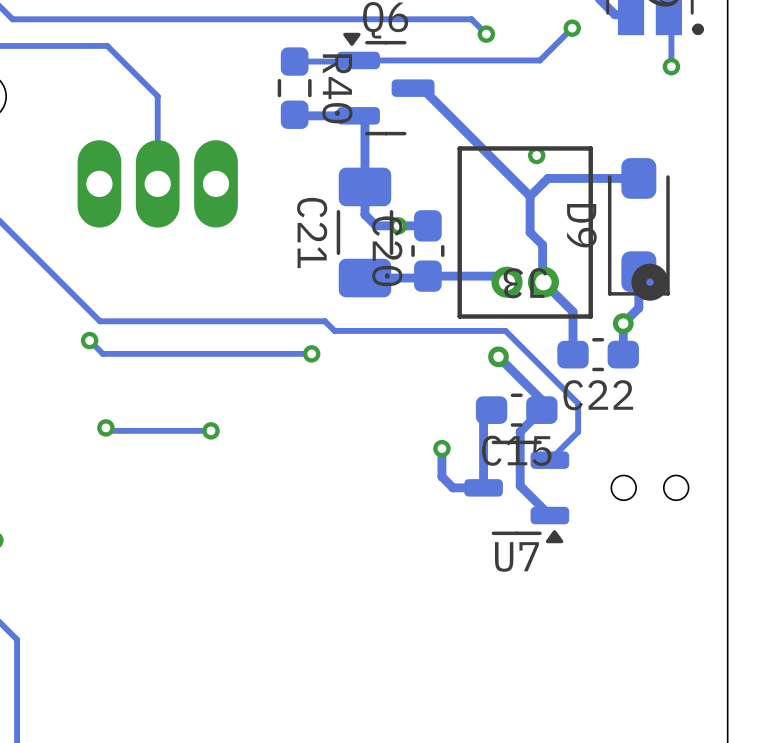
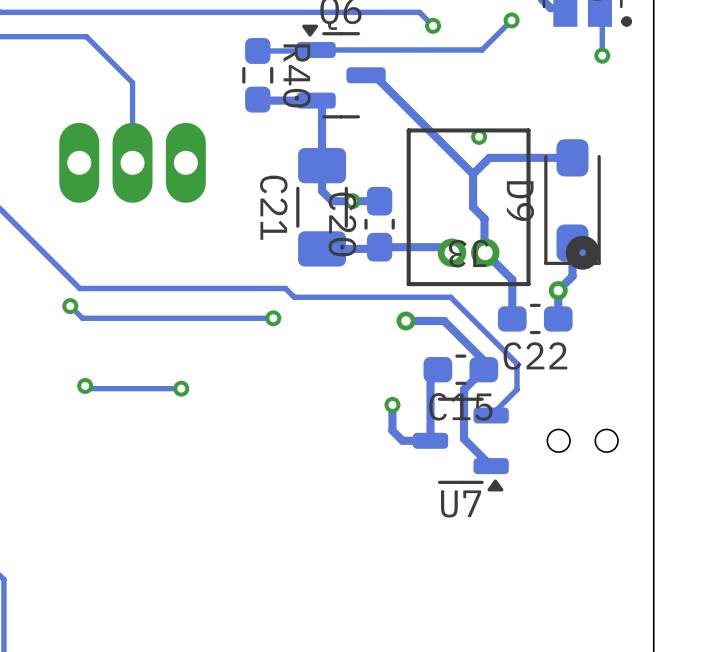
track: none -> (444, 320) (406, 320)
via position: (498, 356) -> (406, 320)

